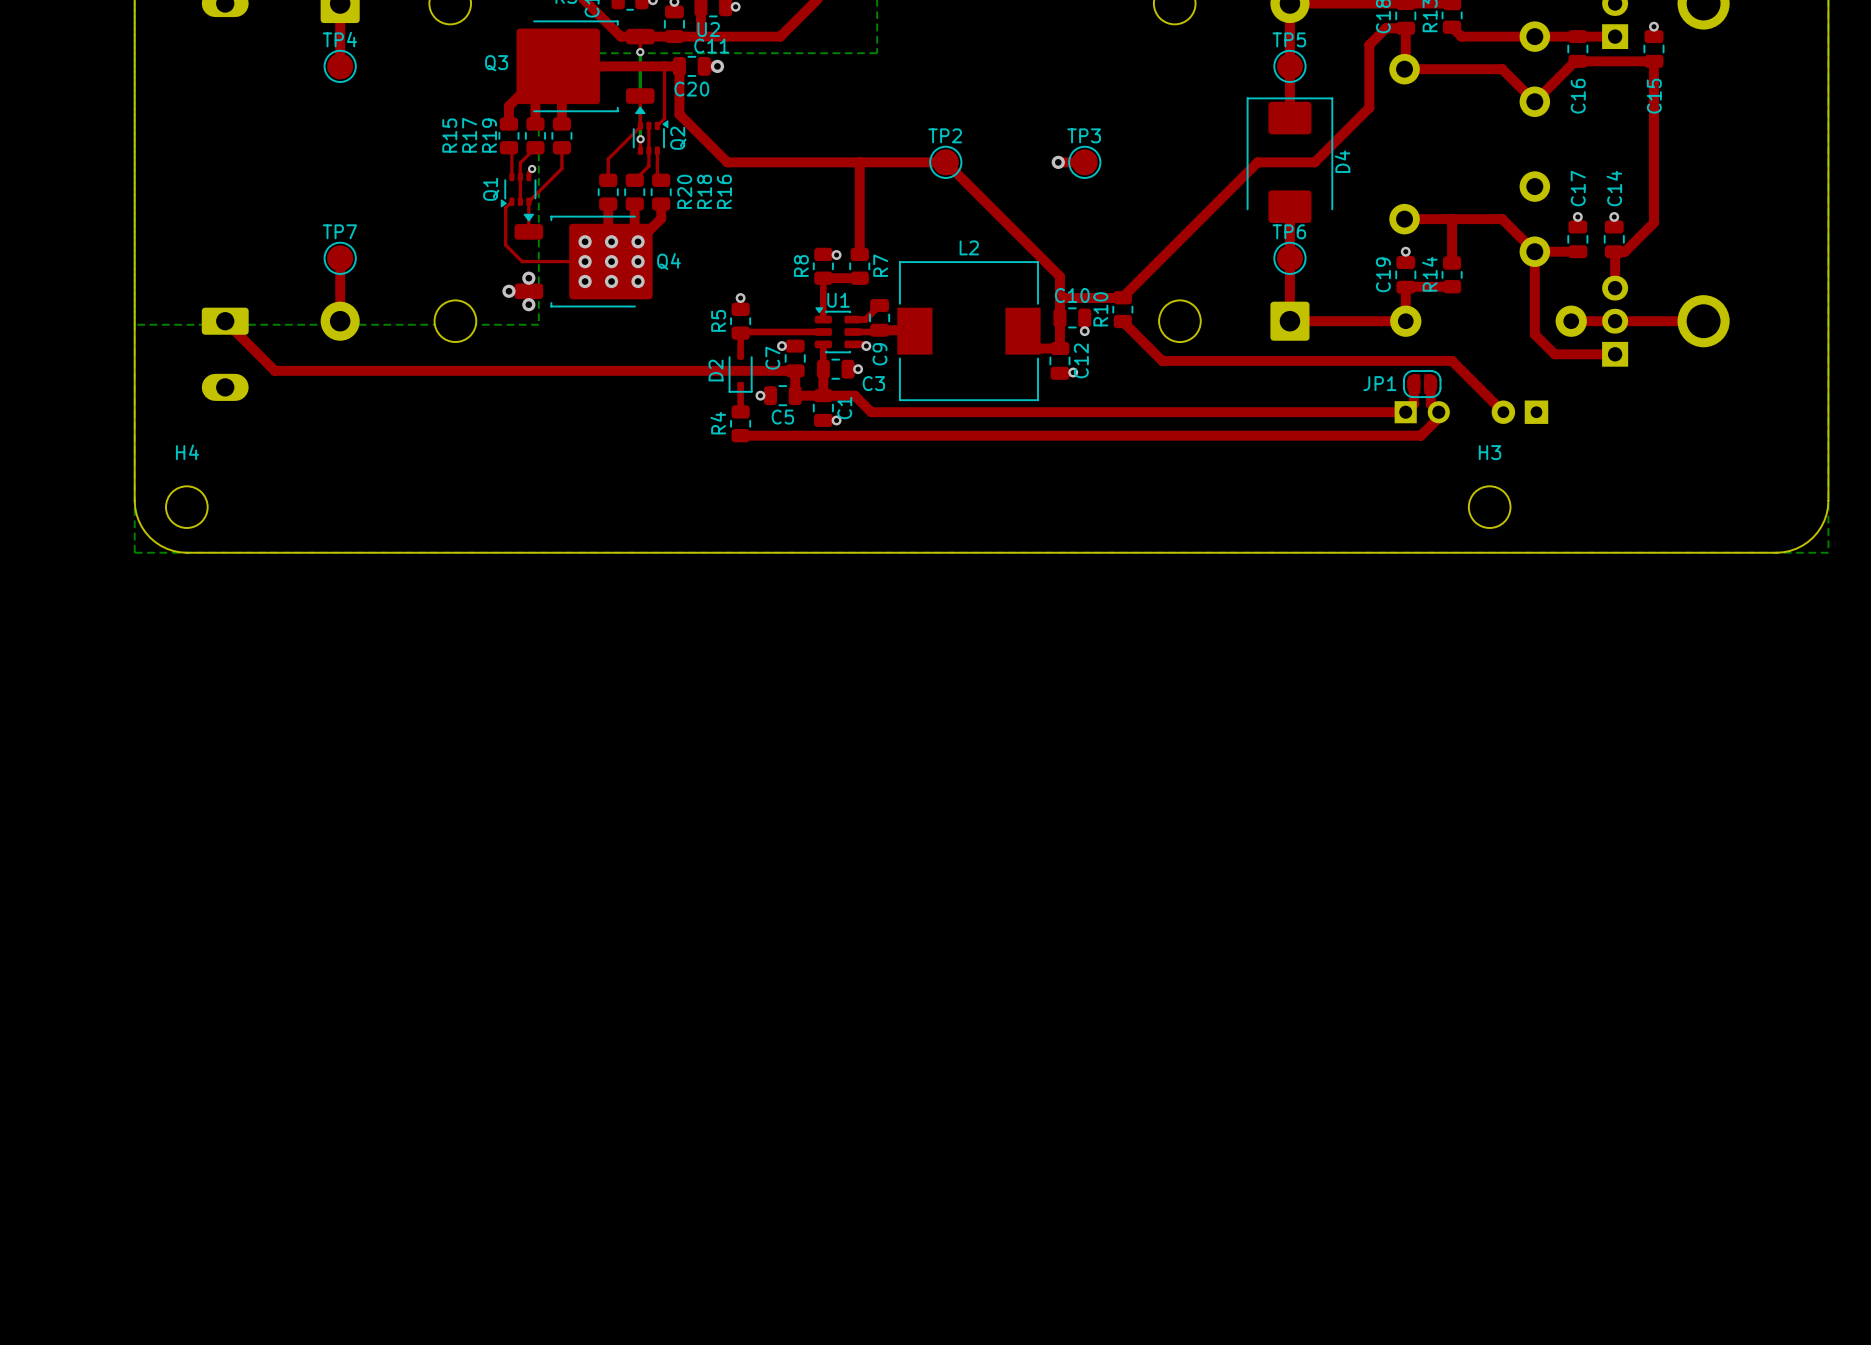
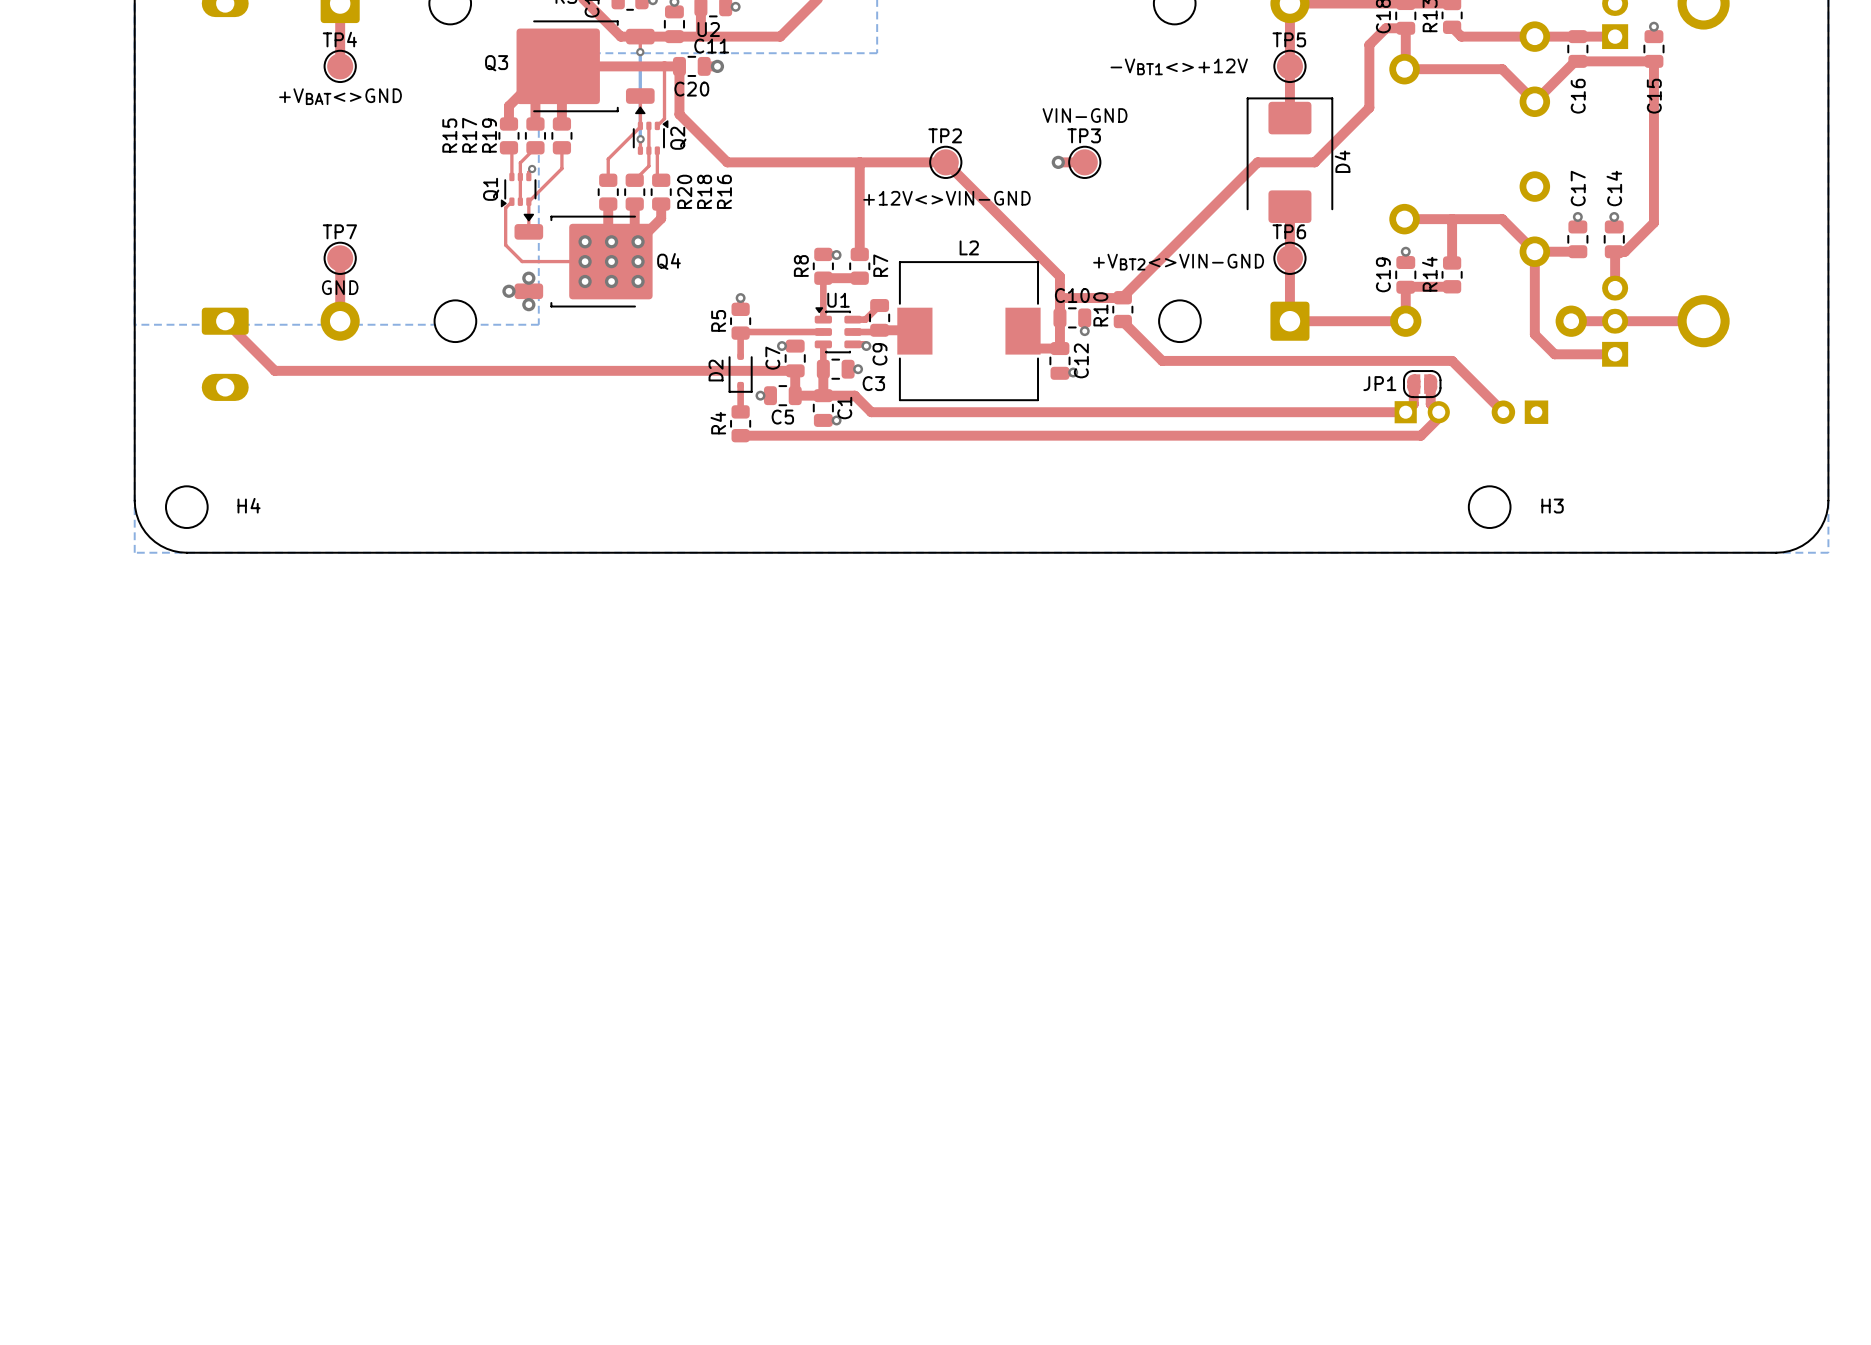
text: none -> -VBT1<>+12V (1179, 66)
text: none -> +VBAT<>GND (340, 96)
text: none -> VIN-GND (1085, 115)
text: none -> +12V<>VIN-GND (946, 198)
text: none -> +VBT2<>VIN-GND (1178, 262)
text: none -> GND (340, 287)
H4 name position: H4 (187, 452) -> H4 (249, 505)
H3 name position: H3 (1489, 452) -> H3 (1552, 506)

